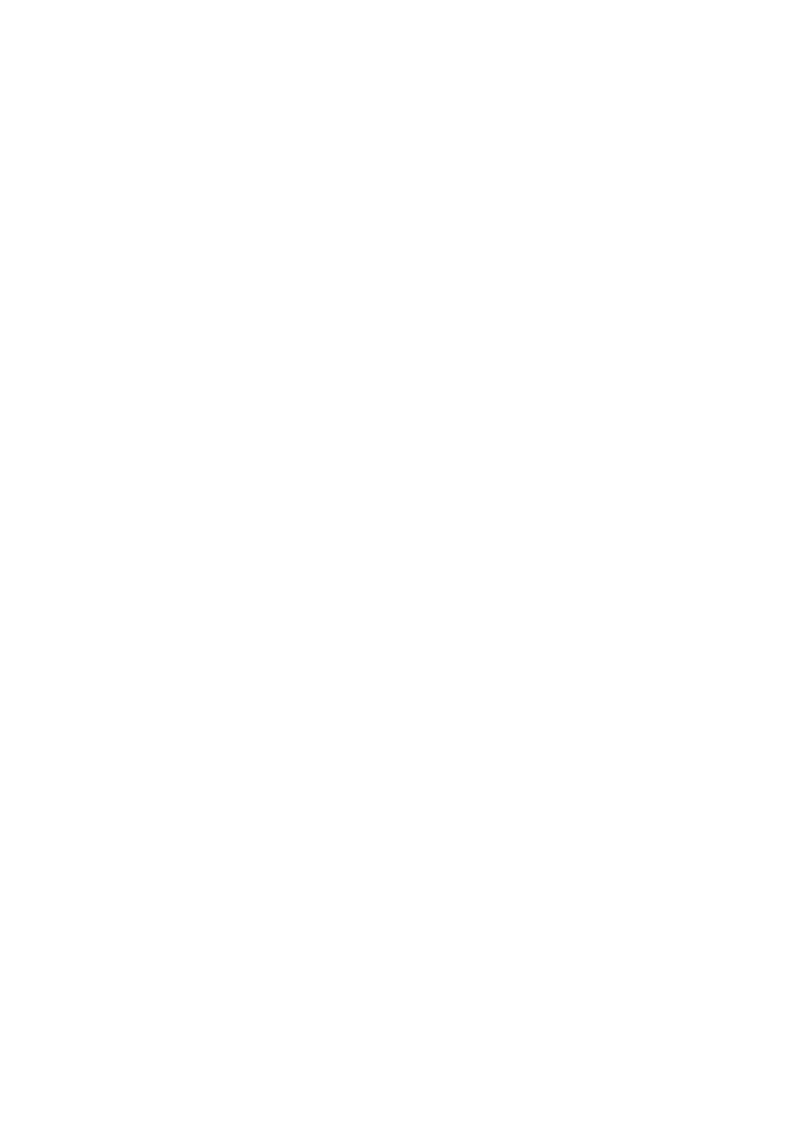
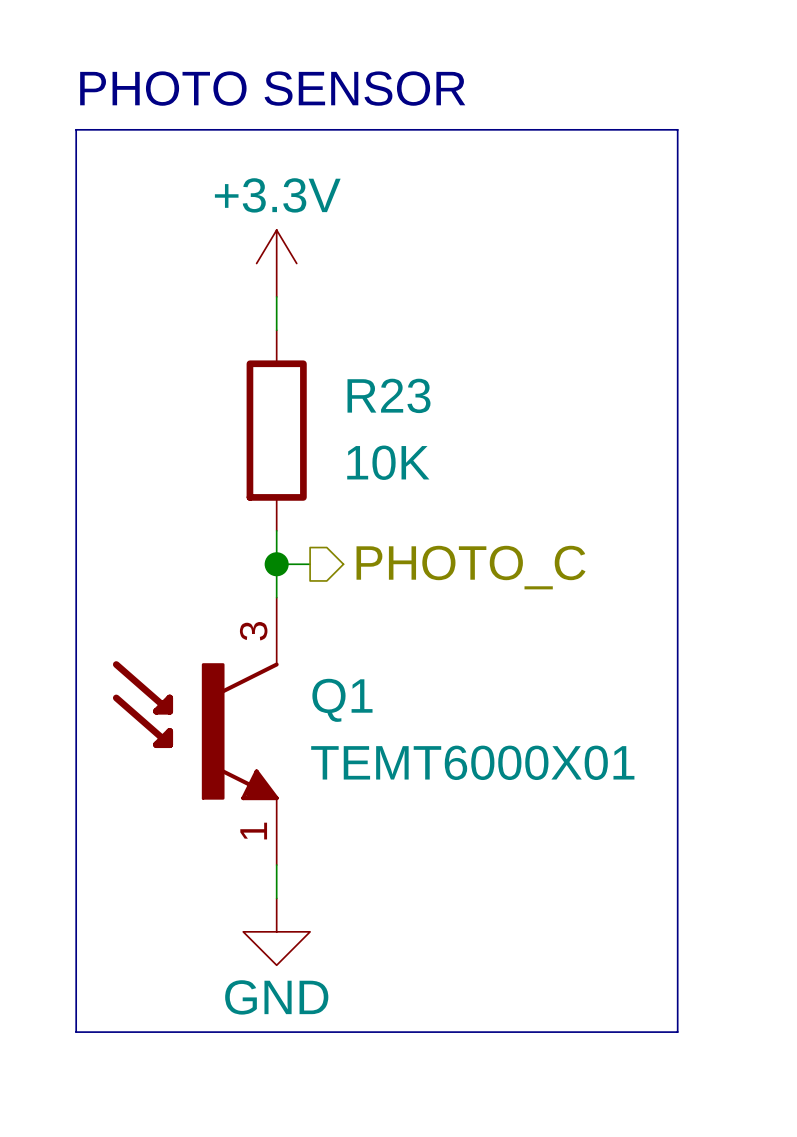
text: none -> PHOTO SENSOR (272, 88)
line: none -> (76, 129) (677, 129) (677, 1032) (76, 1032) (76, 129)
power symbol: none -> +3.3V (276, 263)
wire: none -> (276, 296) (276, 330)
R23: none -> 10K (276, 430)
wire: none -> (276, 530) (276, 597)
wire: none -> (276, 564) (310, 564)
junction: none -> (276, 564)
hierarchical label: none -> PHOTO_C (471, 567)
Q1: none -> TEMT6000X01 (195, 731)
wire: none -> (276, 865) (276, 898)
power symbol: none -> GND (276, 931)

